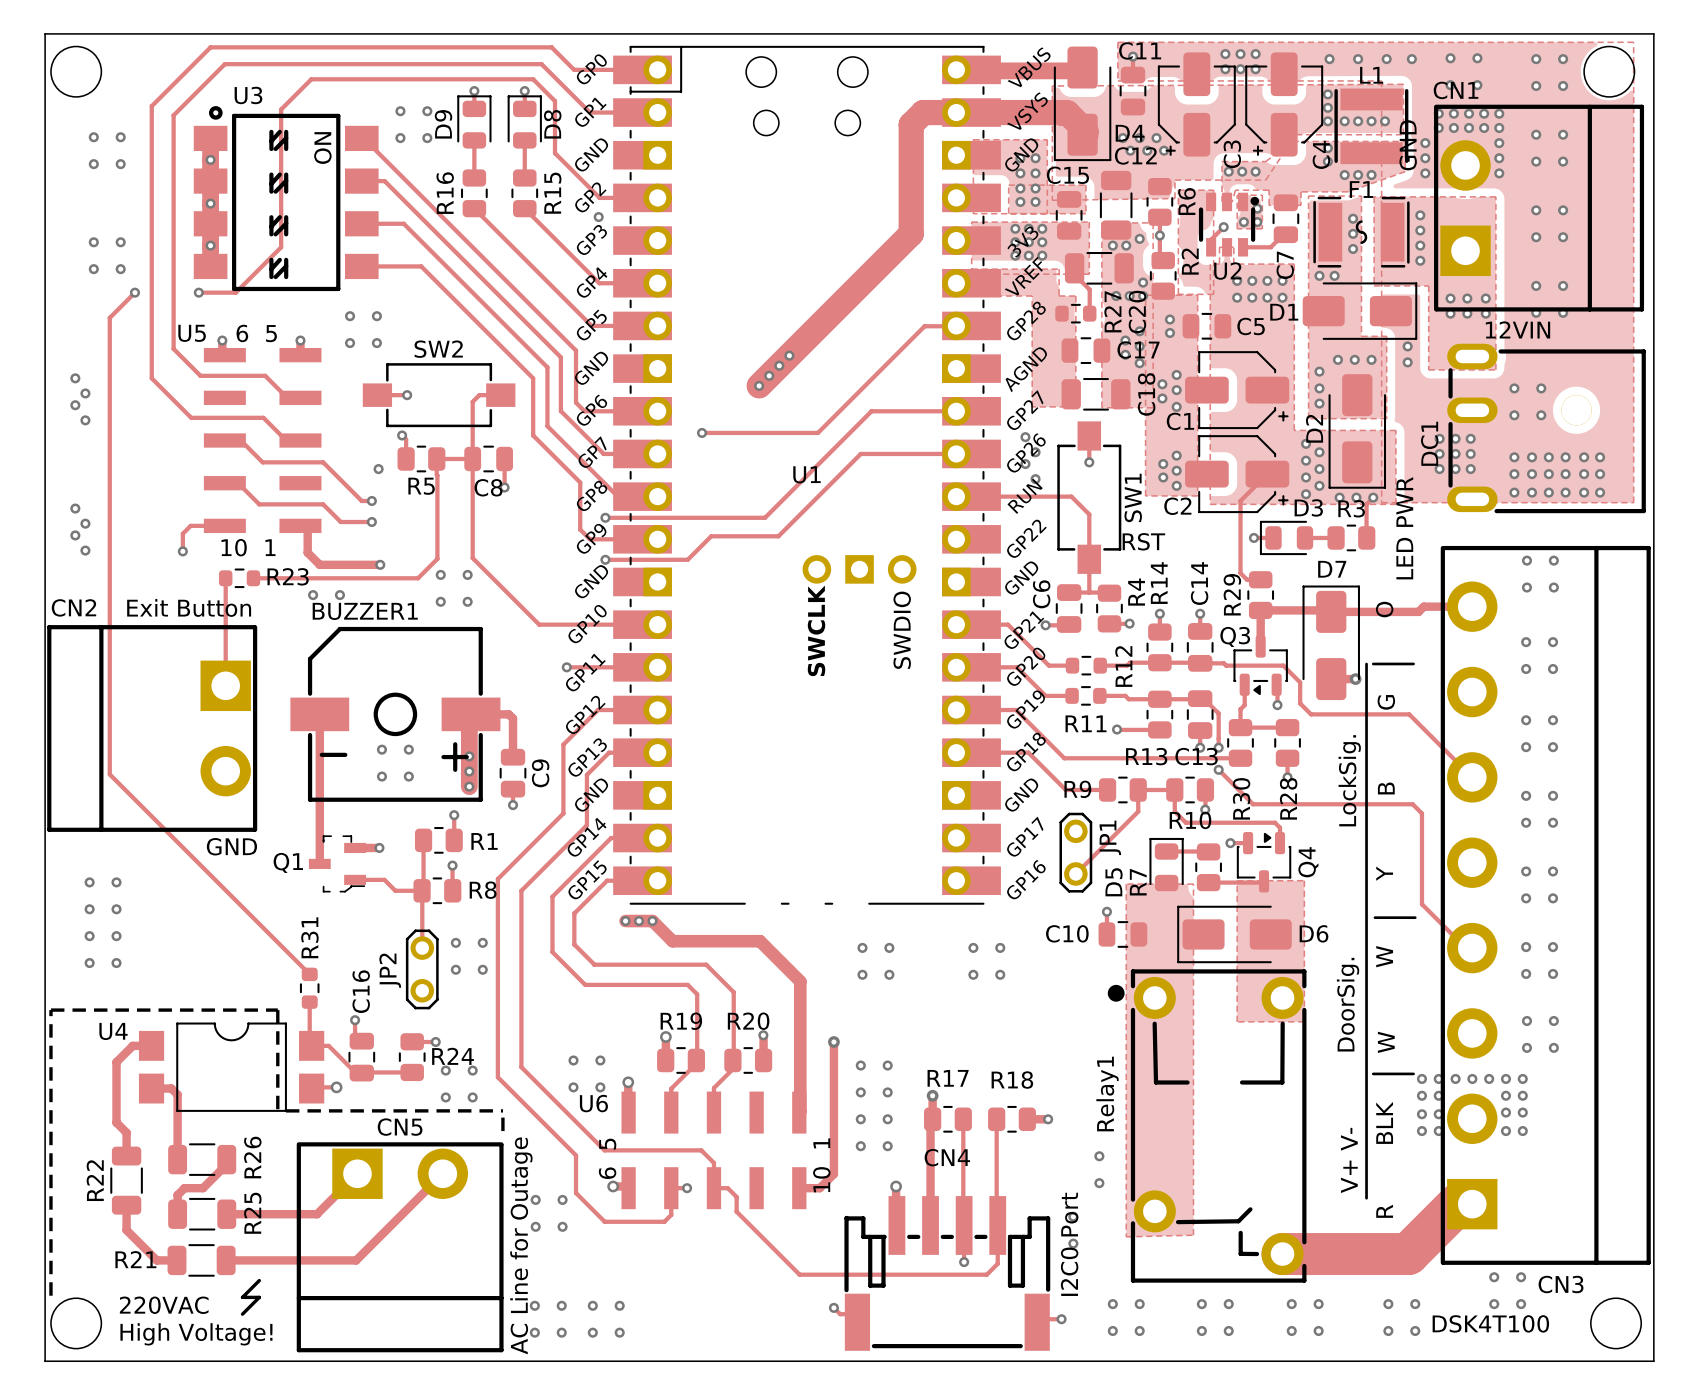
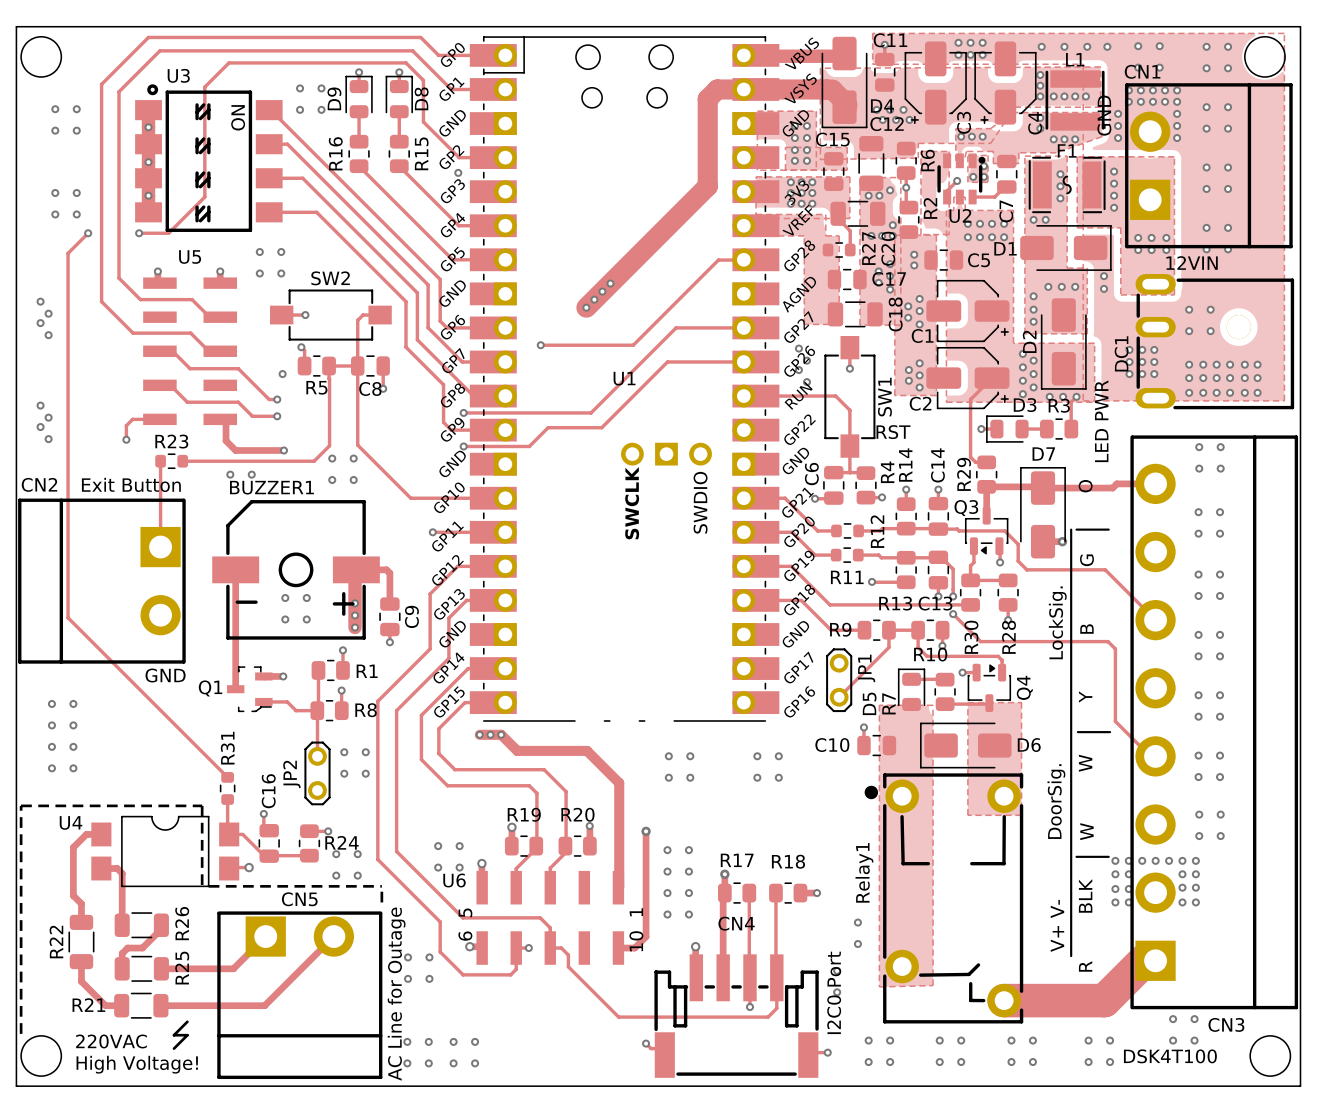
U5 name position: U5 (192, 333) -> U5 (190, 257)
text: 6 5 (256, 333) -> none
text: 10 1 (248, 547) -> none
R23 name position: R23 (288, 576) -> R23 (171, 441)

